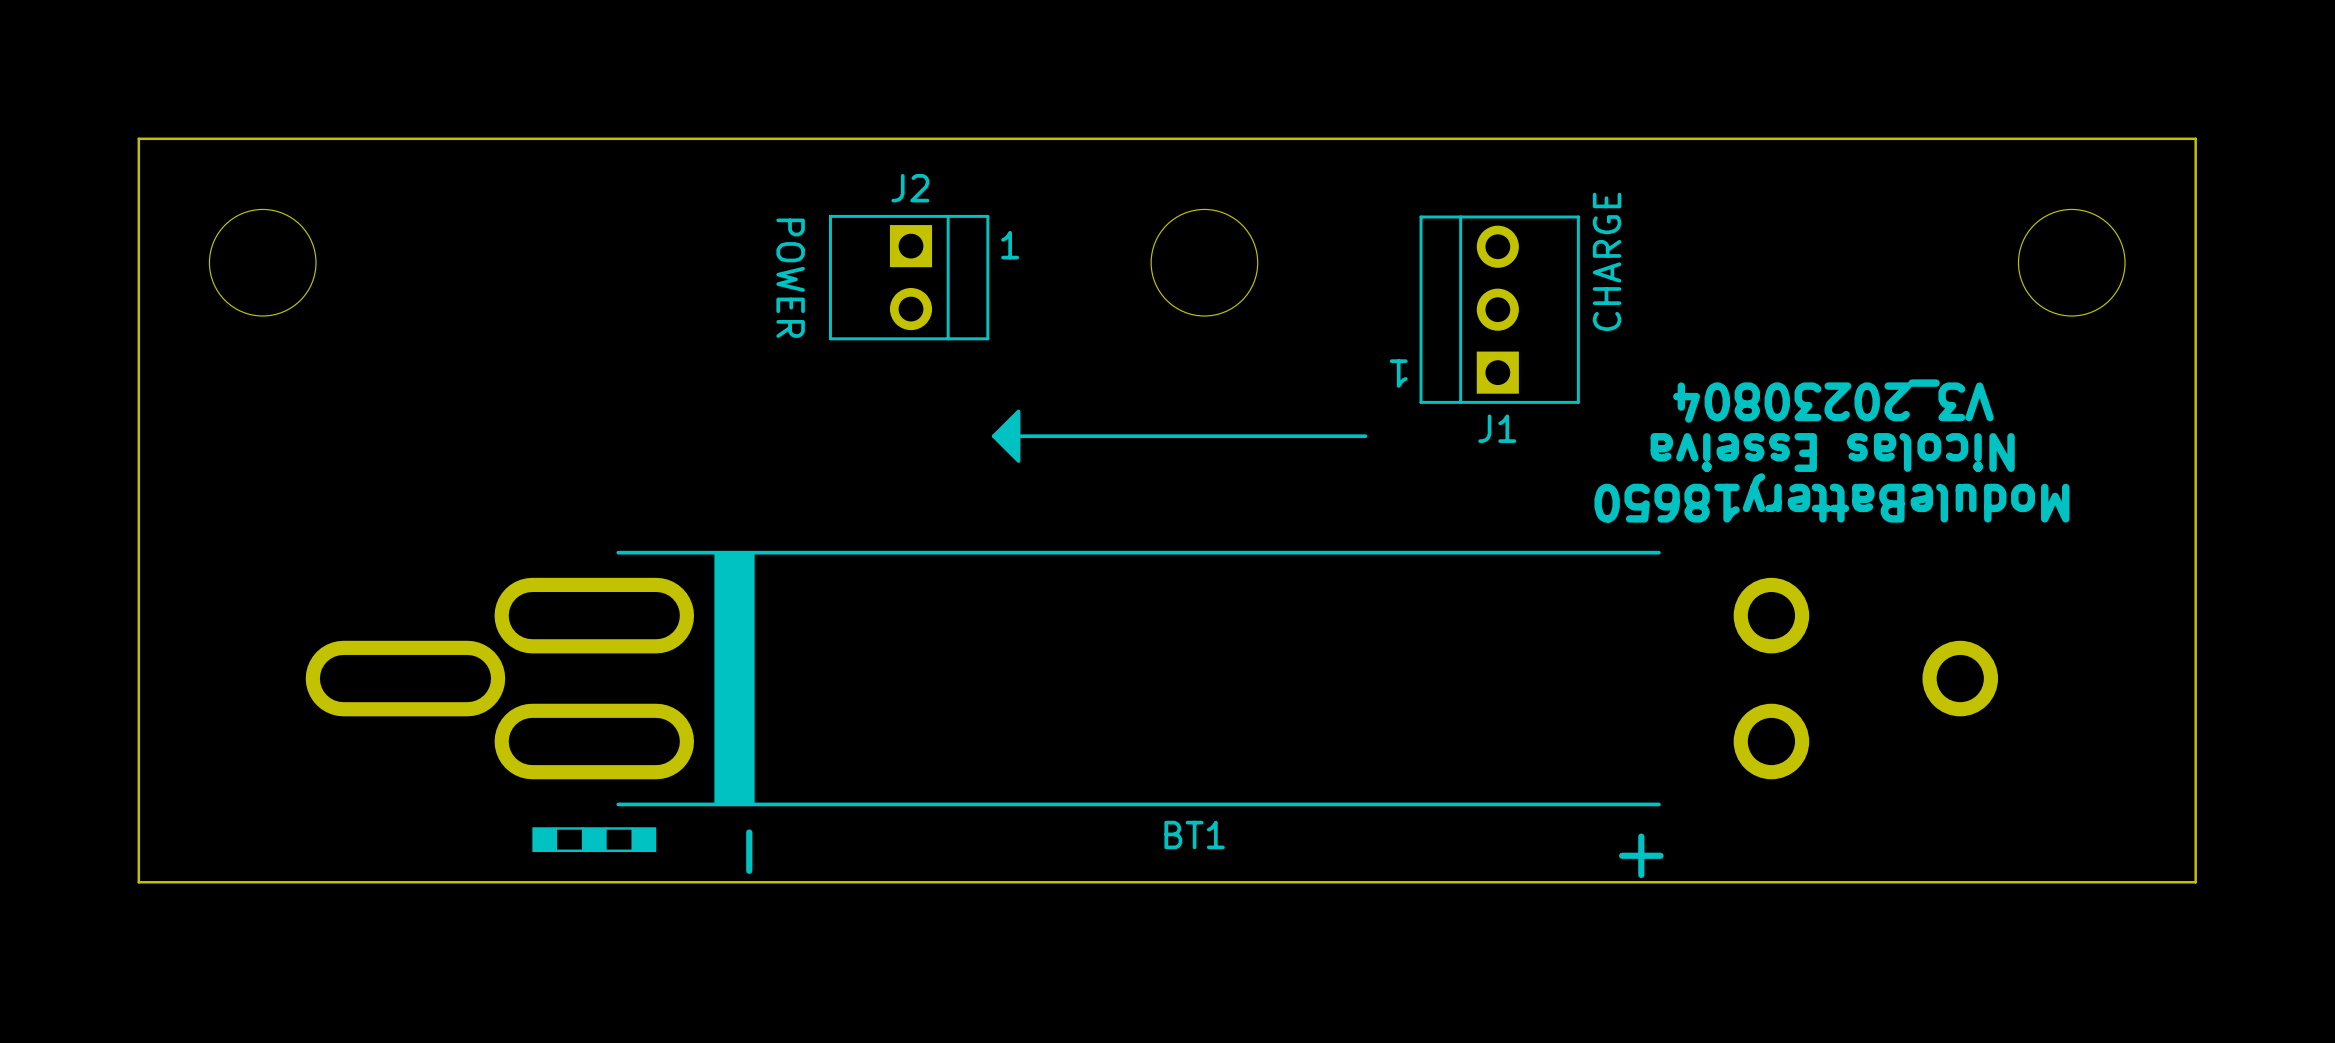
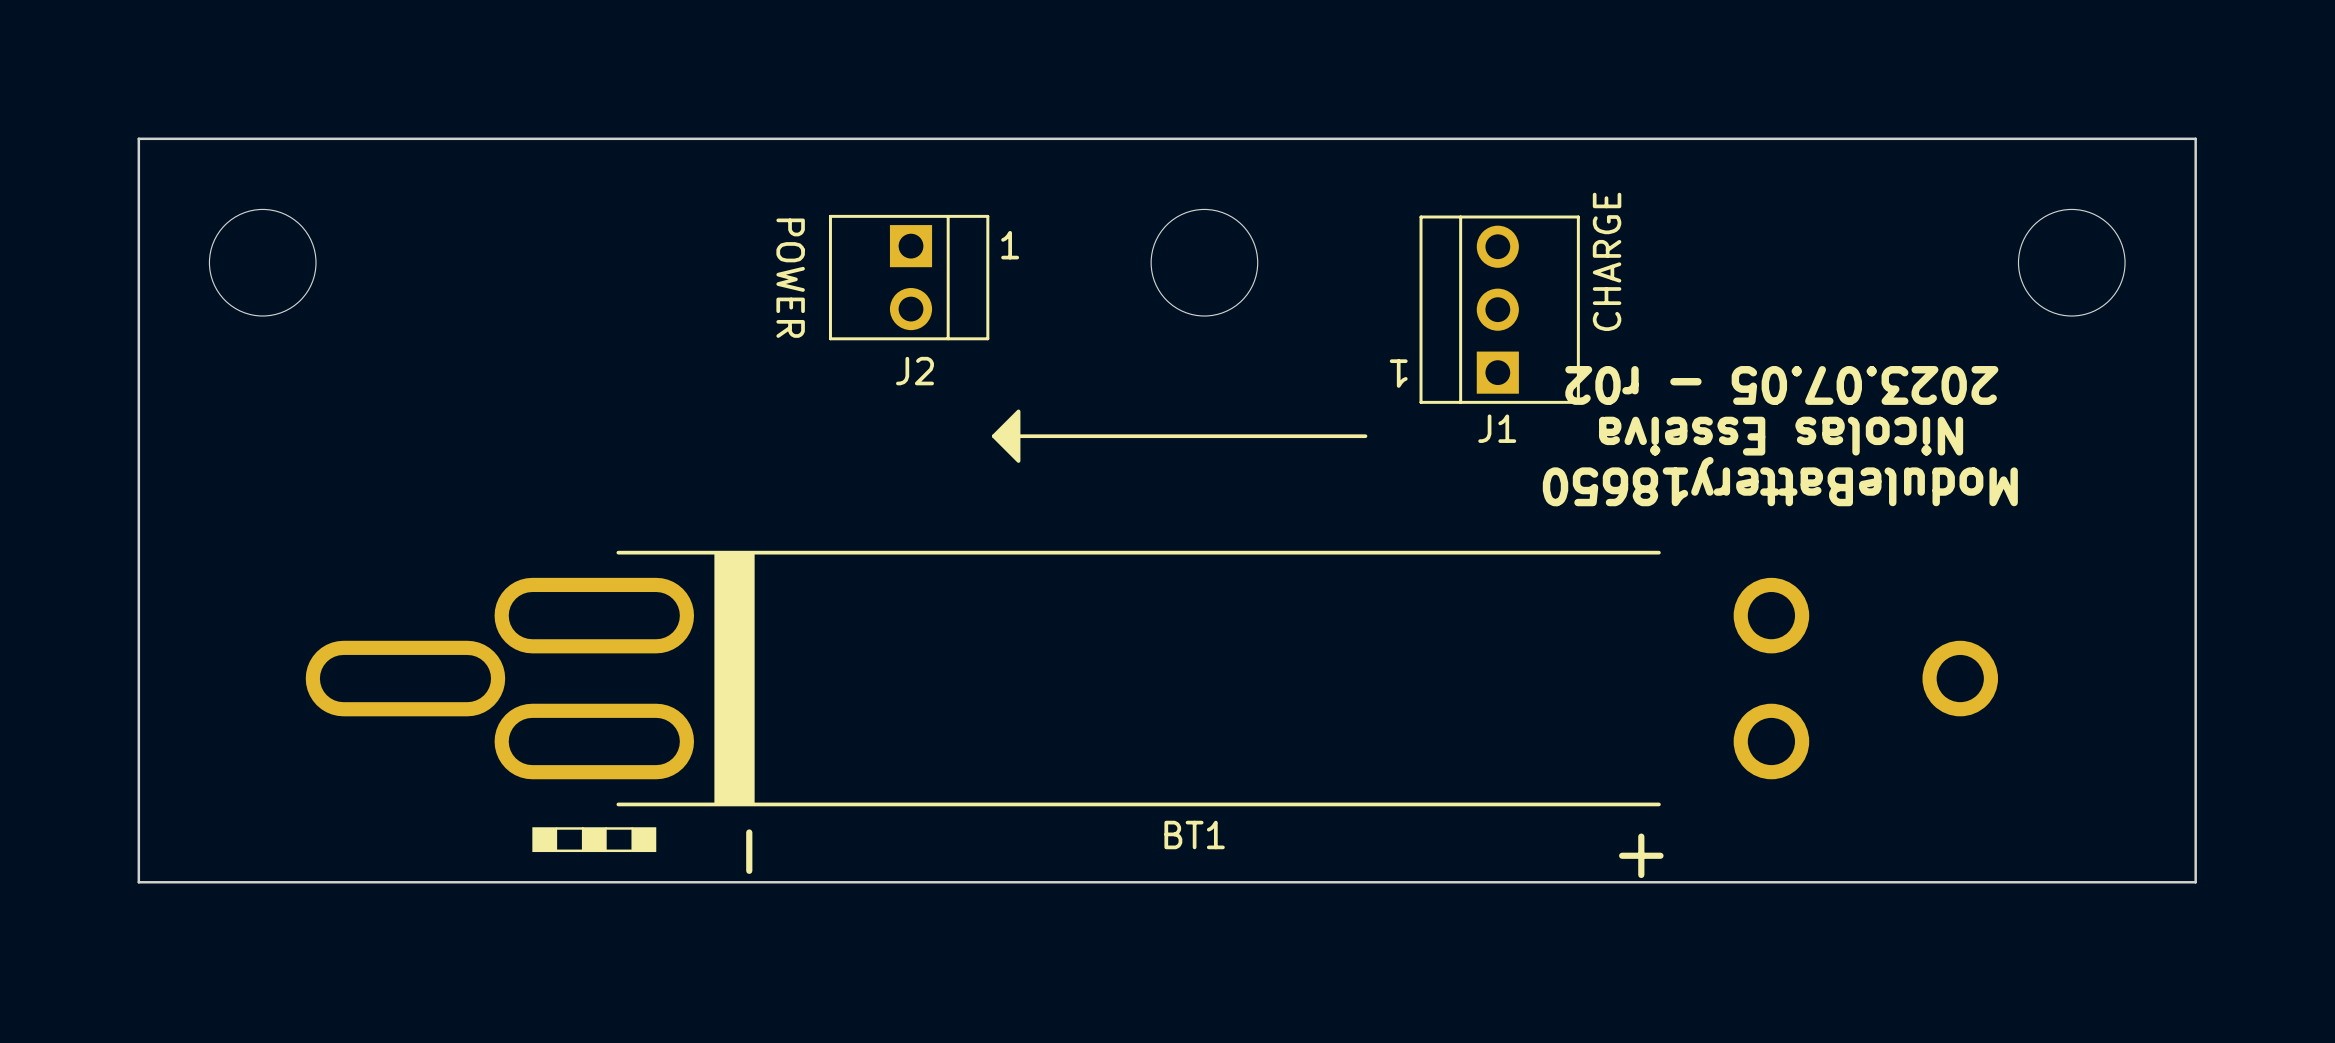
J2 name position: J2 (910, 188) -> J2 (915, 371)
text: none -> 2023.07.05 - r02 (1781, 385)
text: V3_20230804 (1833, 401) -> none
text position: Nicolas Esseiva (1832, 452) -> Nicolas Esseiva (1781, 436)
text position: ModuleBattery18650 (1831, 497) -> ModuleBattery18650 (1780, 481)

